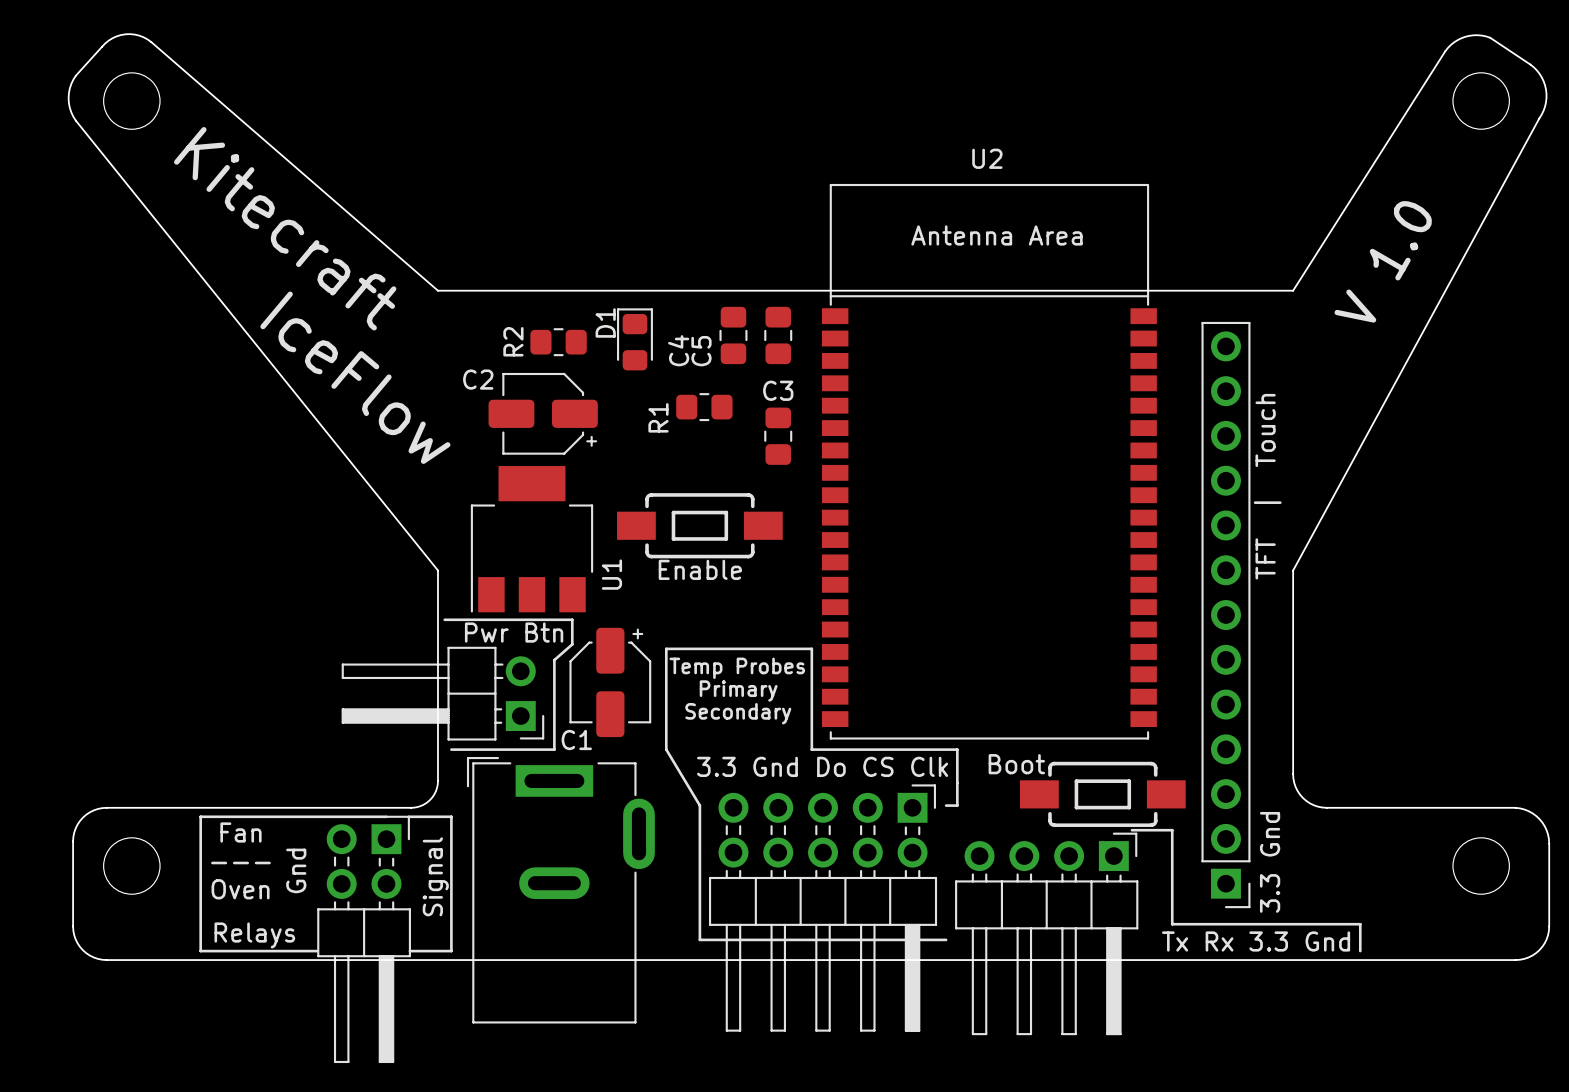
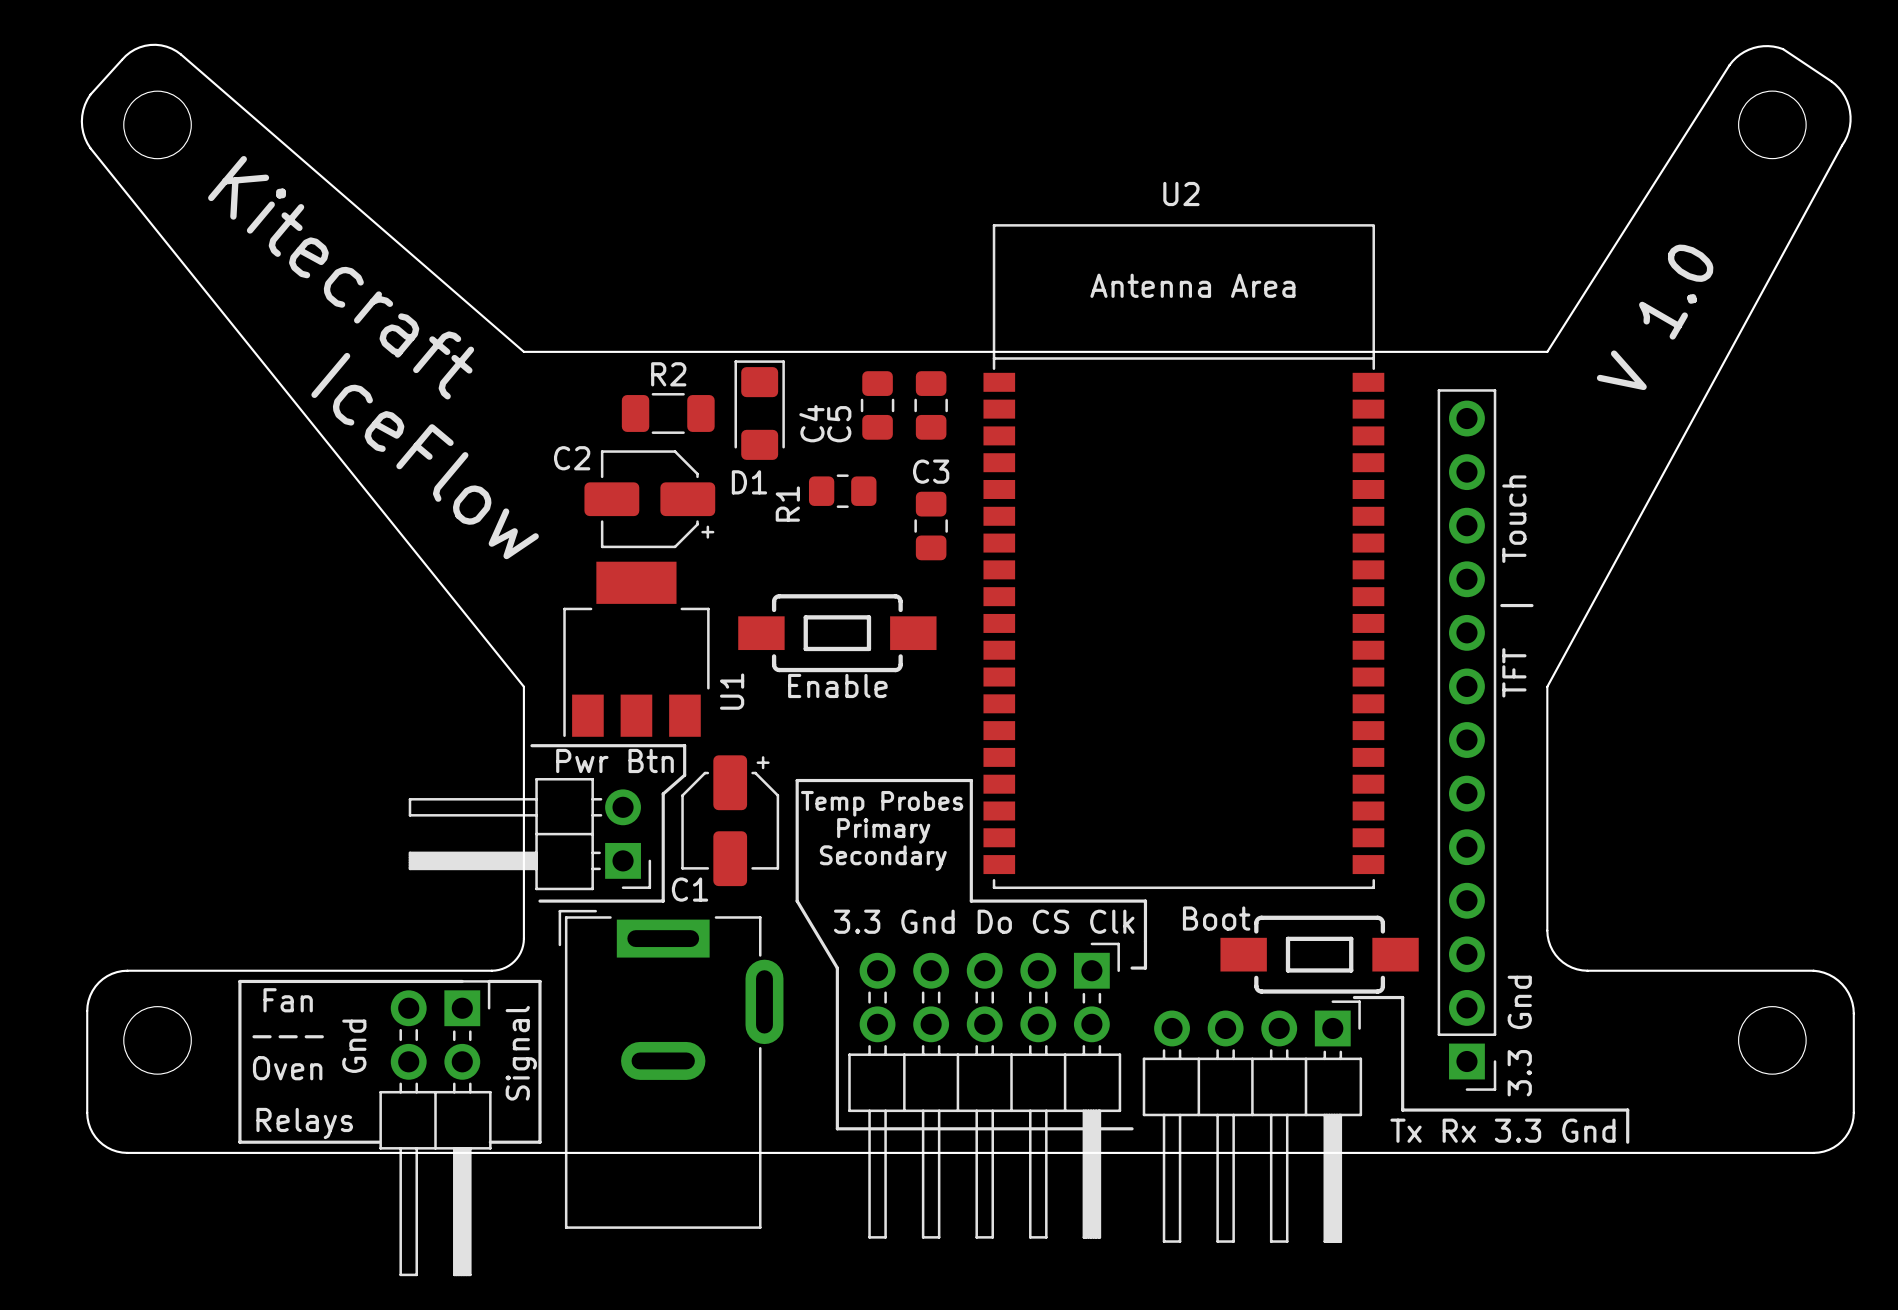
D1 footprint: [616, 308, 653, 371] -> [734, 360, 785, 460]
D1 name rotation: 0° (605, 322) -> 90° clockwise (749, 482)
D1 name position: D1 (605, 322) -> D1 (749, 482)
R2 footprint: [530, 328, 587, 357] -> [621, 393, 715, 434]
R2 name rotation: 0° (513, 341) -> 90° clockwise (668, 374)
R2 name position: R2 (513, 341) -> R2 (668, 374)

